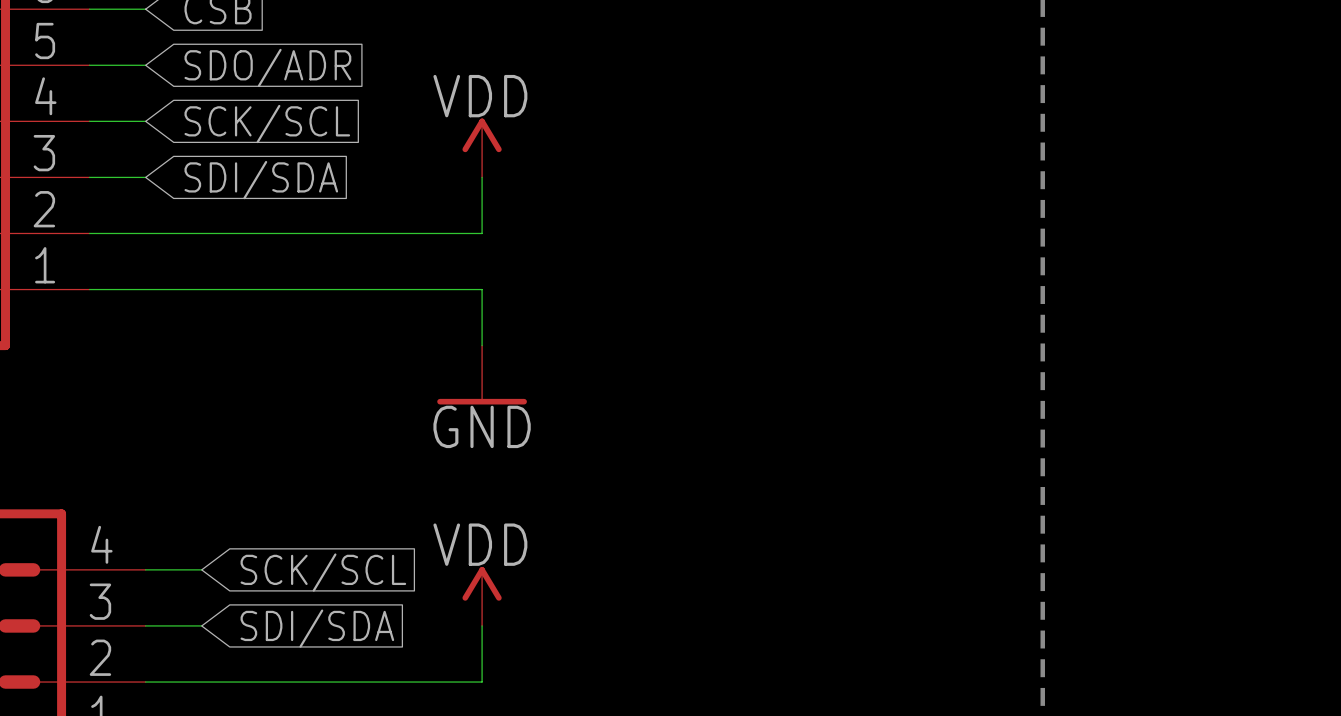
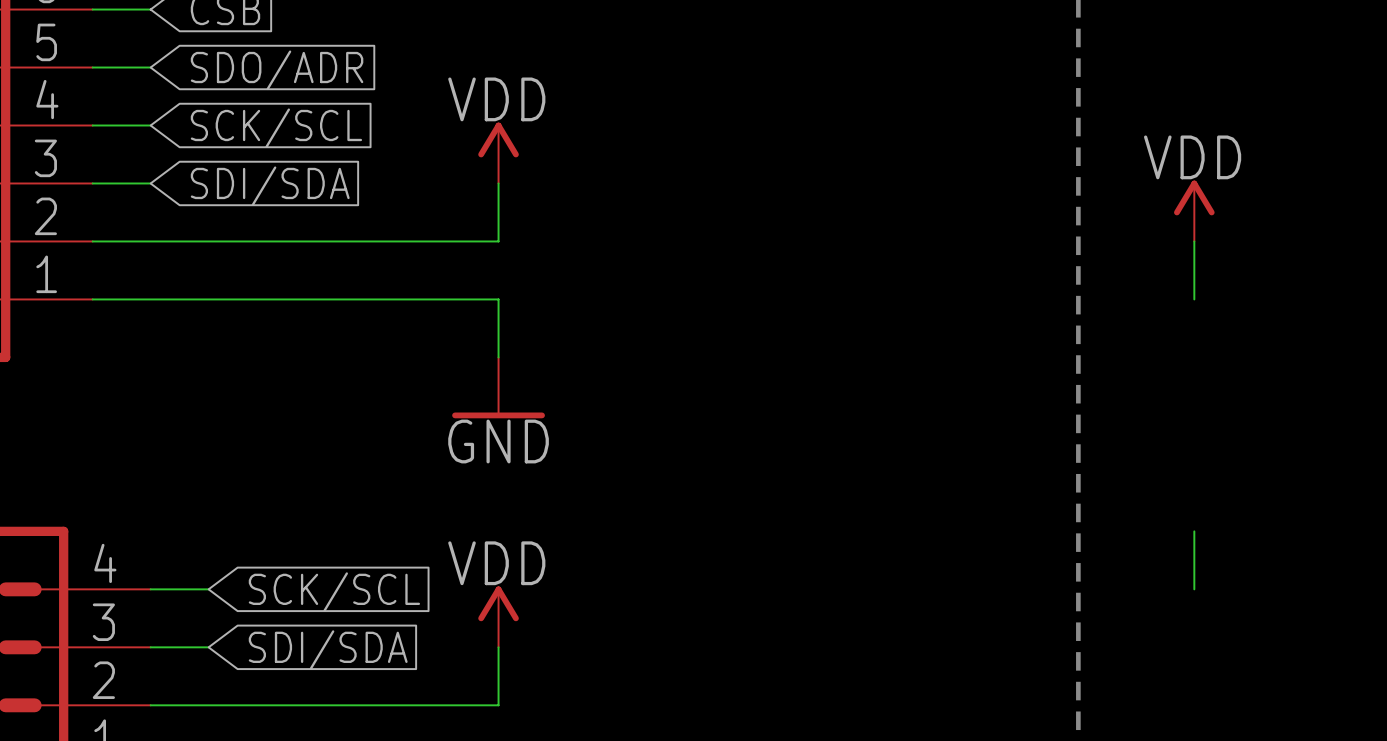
power symbol: none -> VDD (1194, 211)
wire: none -> (1194, 241) (1194, 299)
wire: none -> (1194, 531) (1194, 589)

